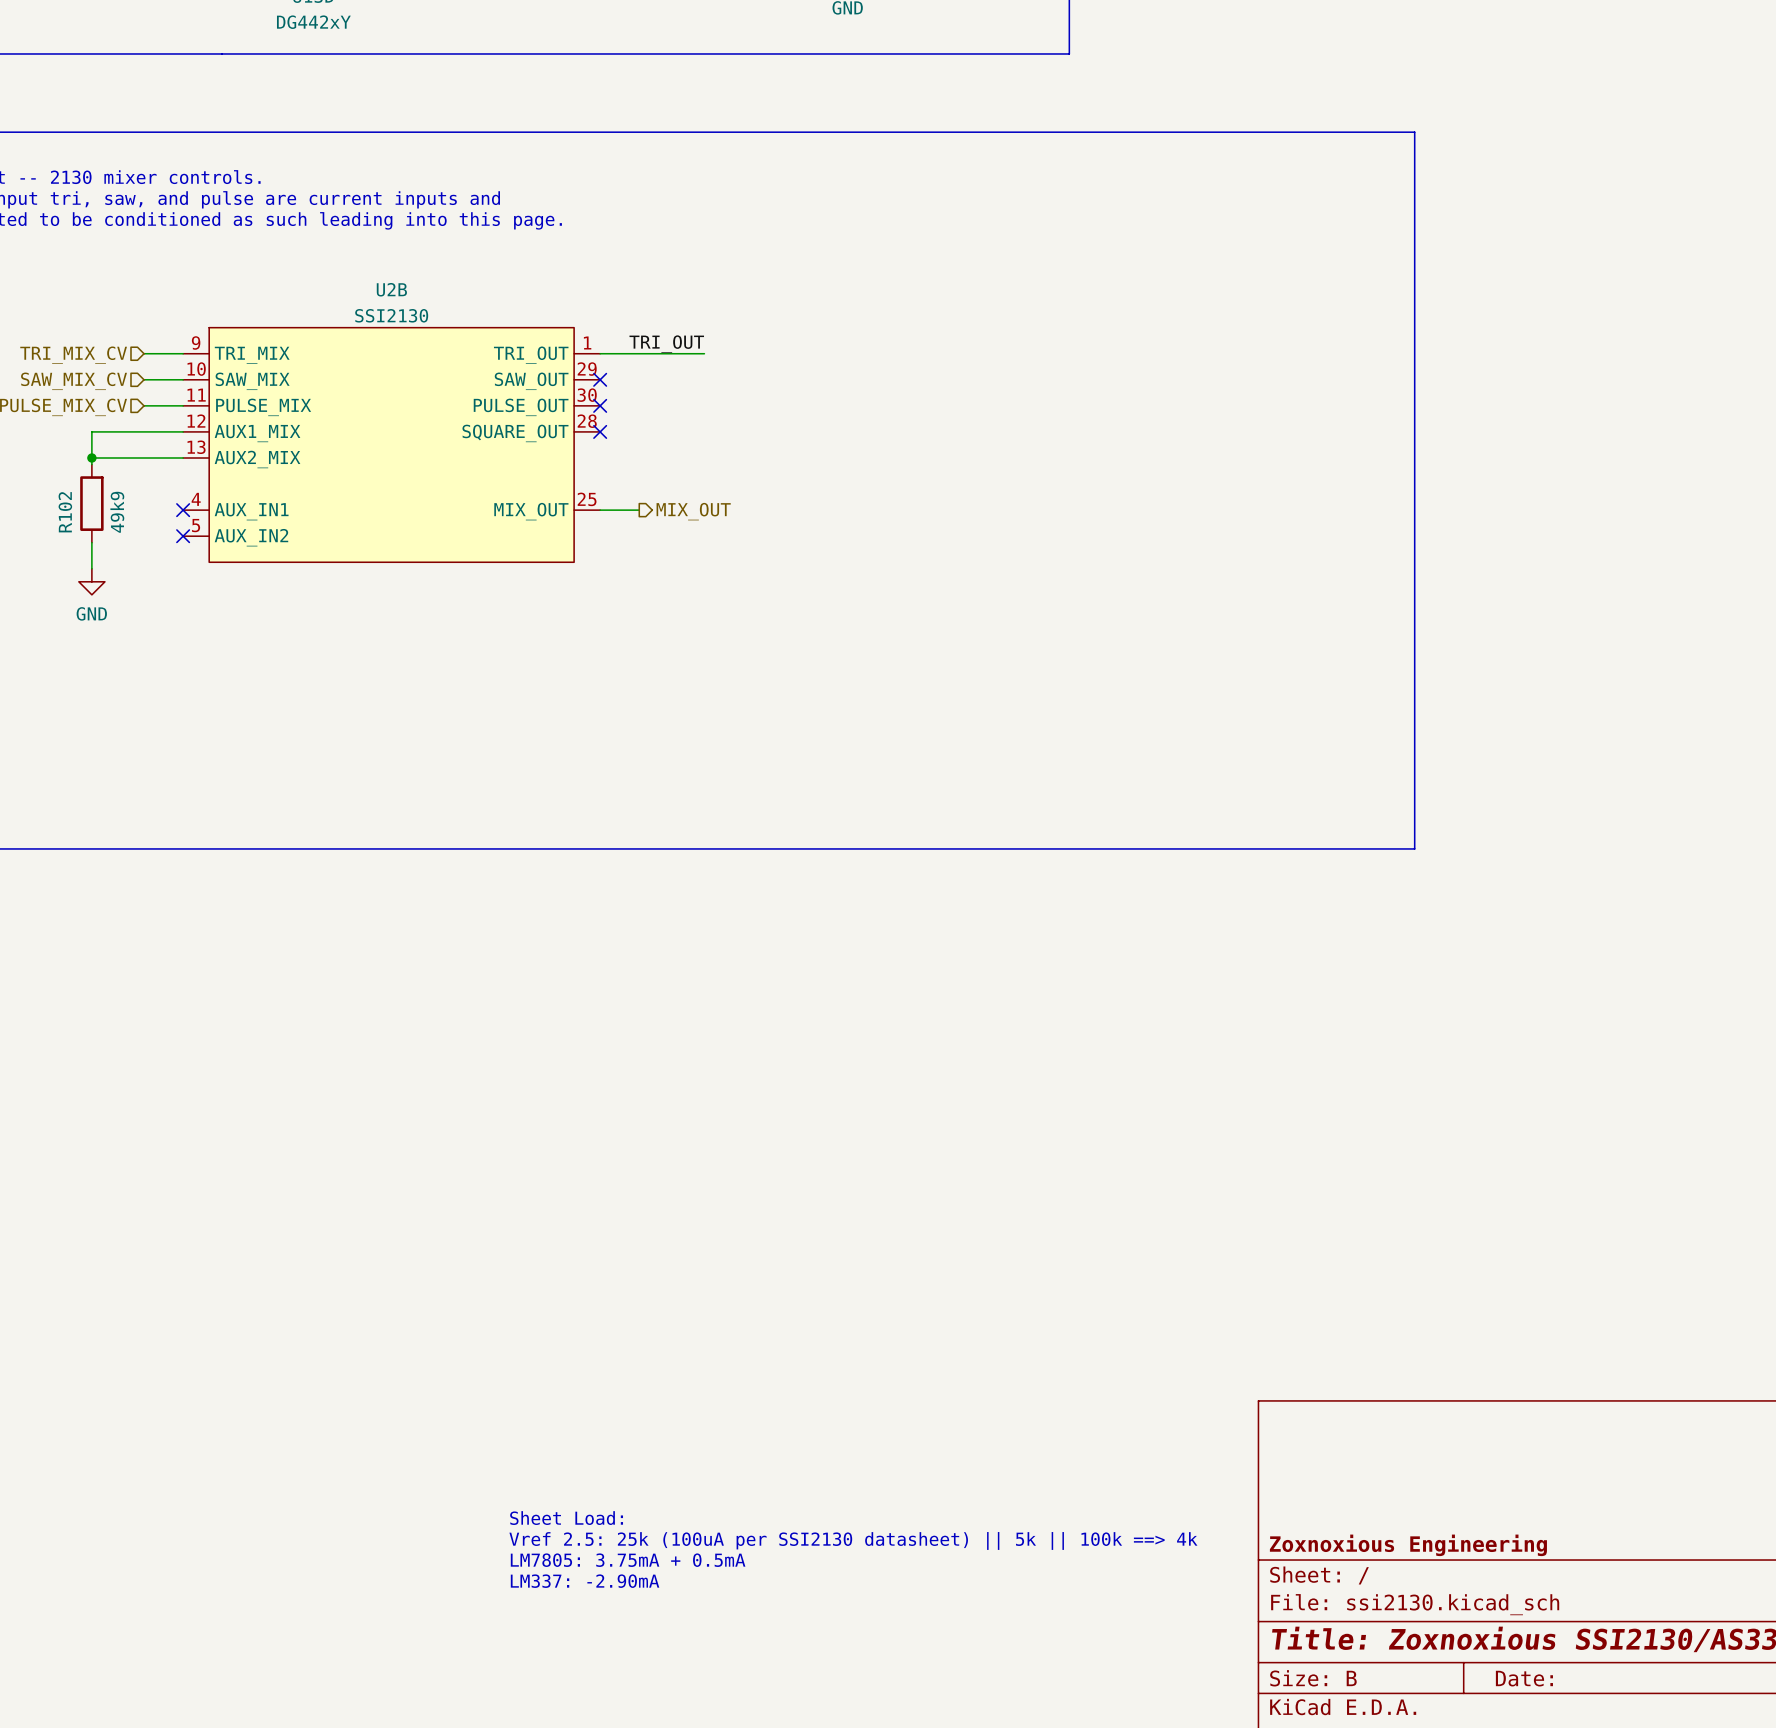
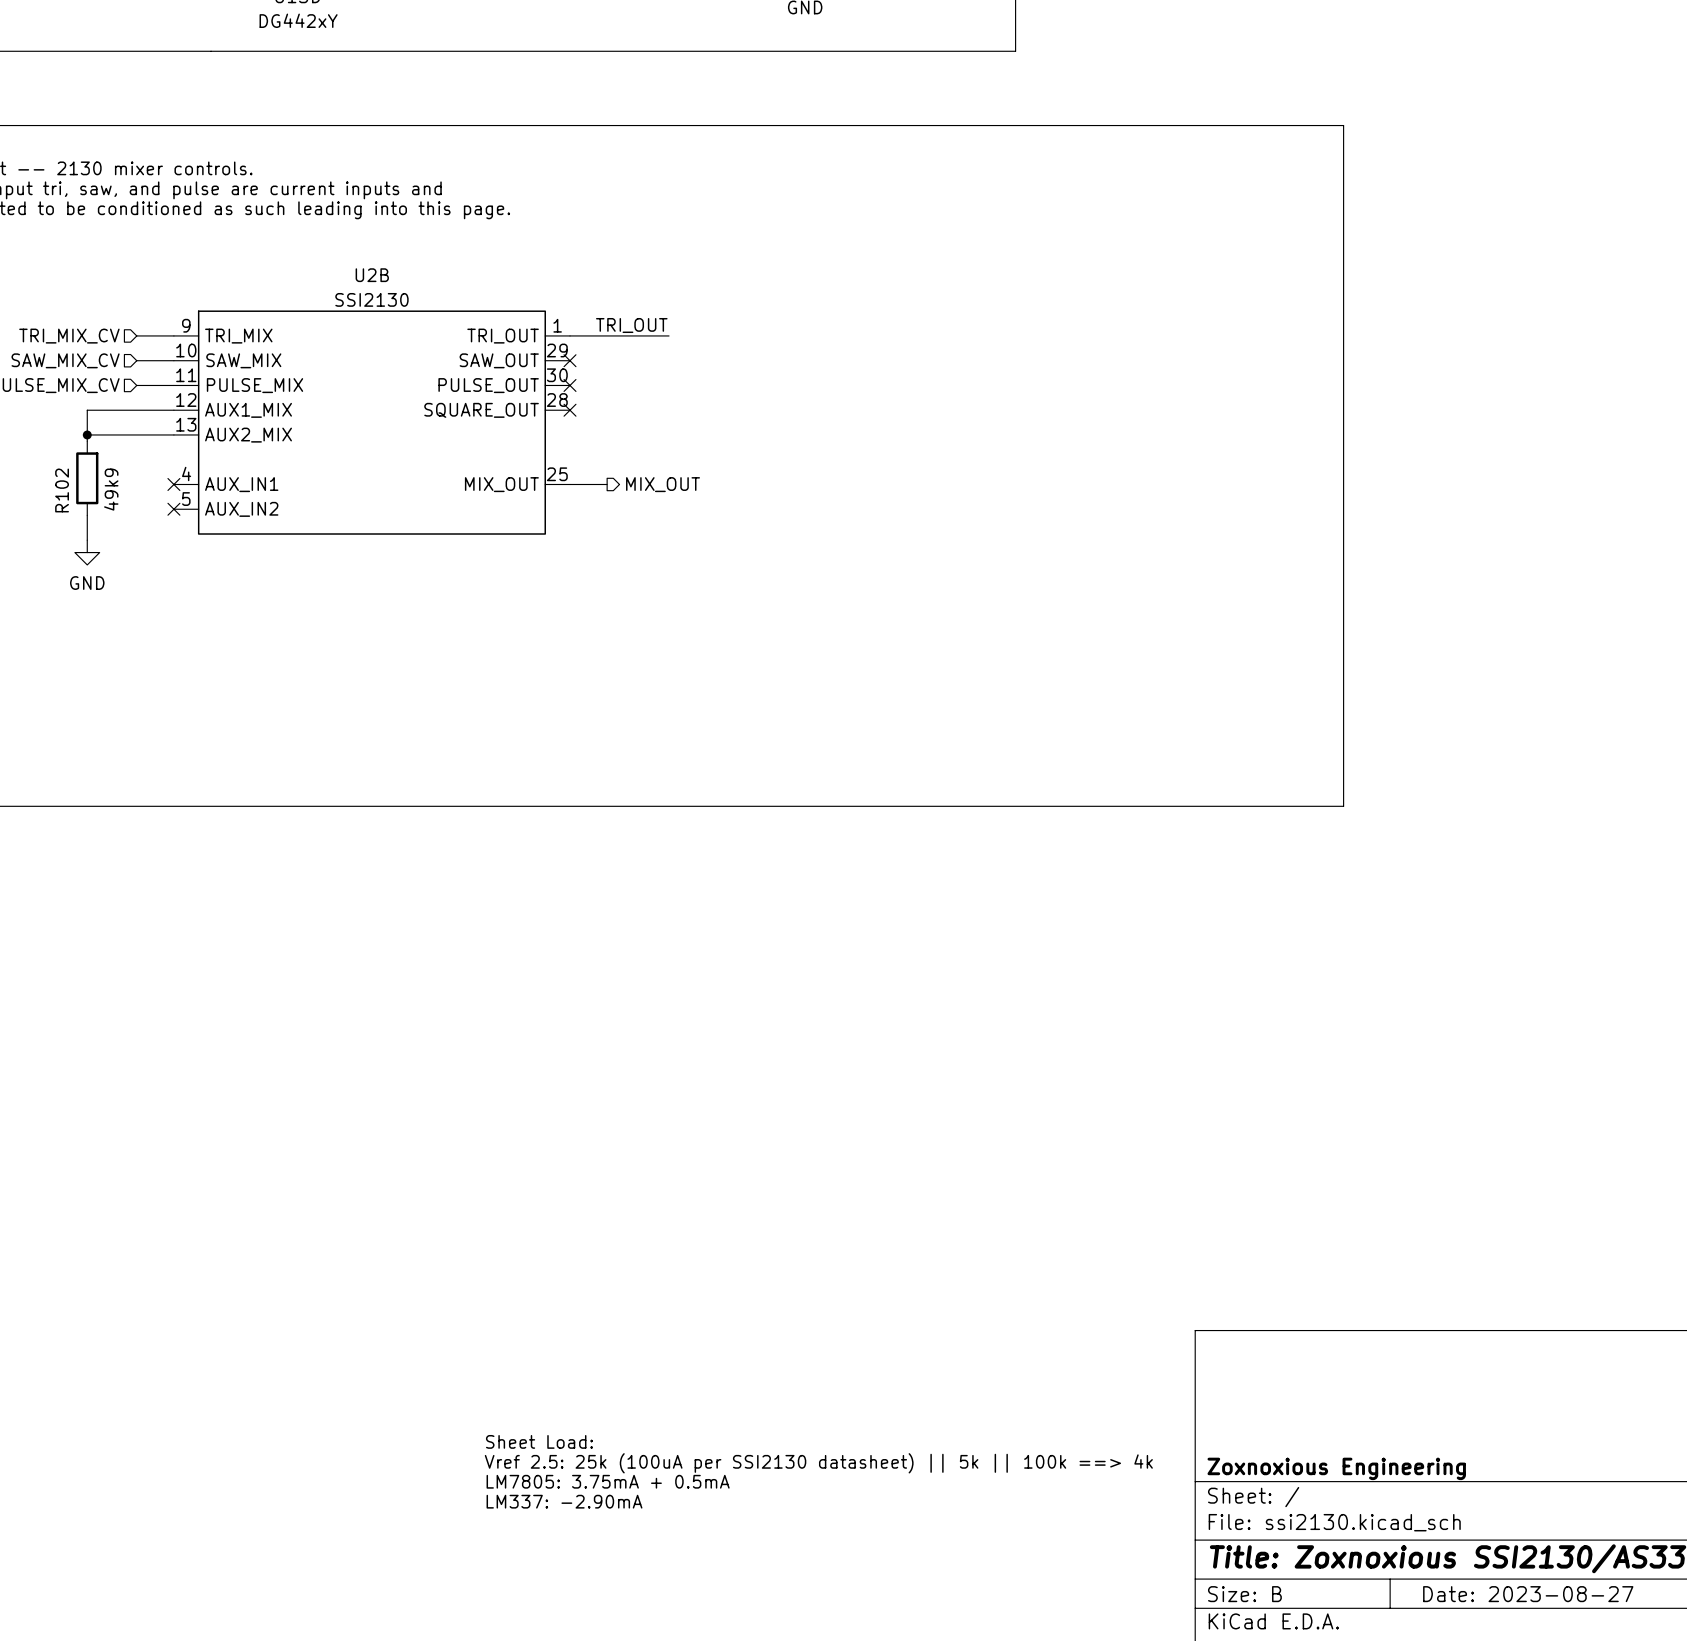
title block: Date: (1524, 1678) -> Date: 2023-08-27 (1528, 1594)

